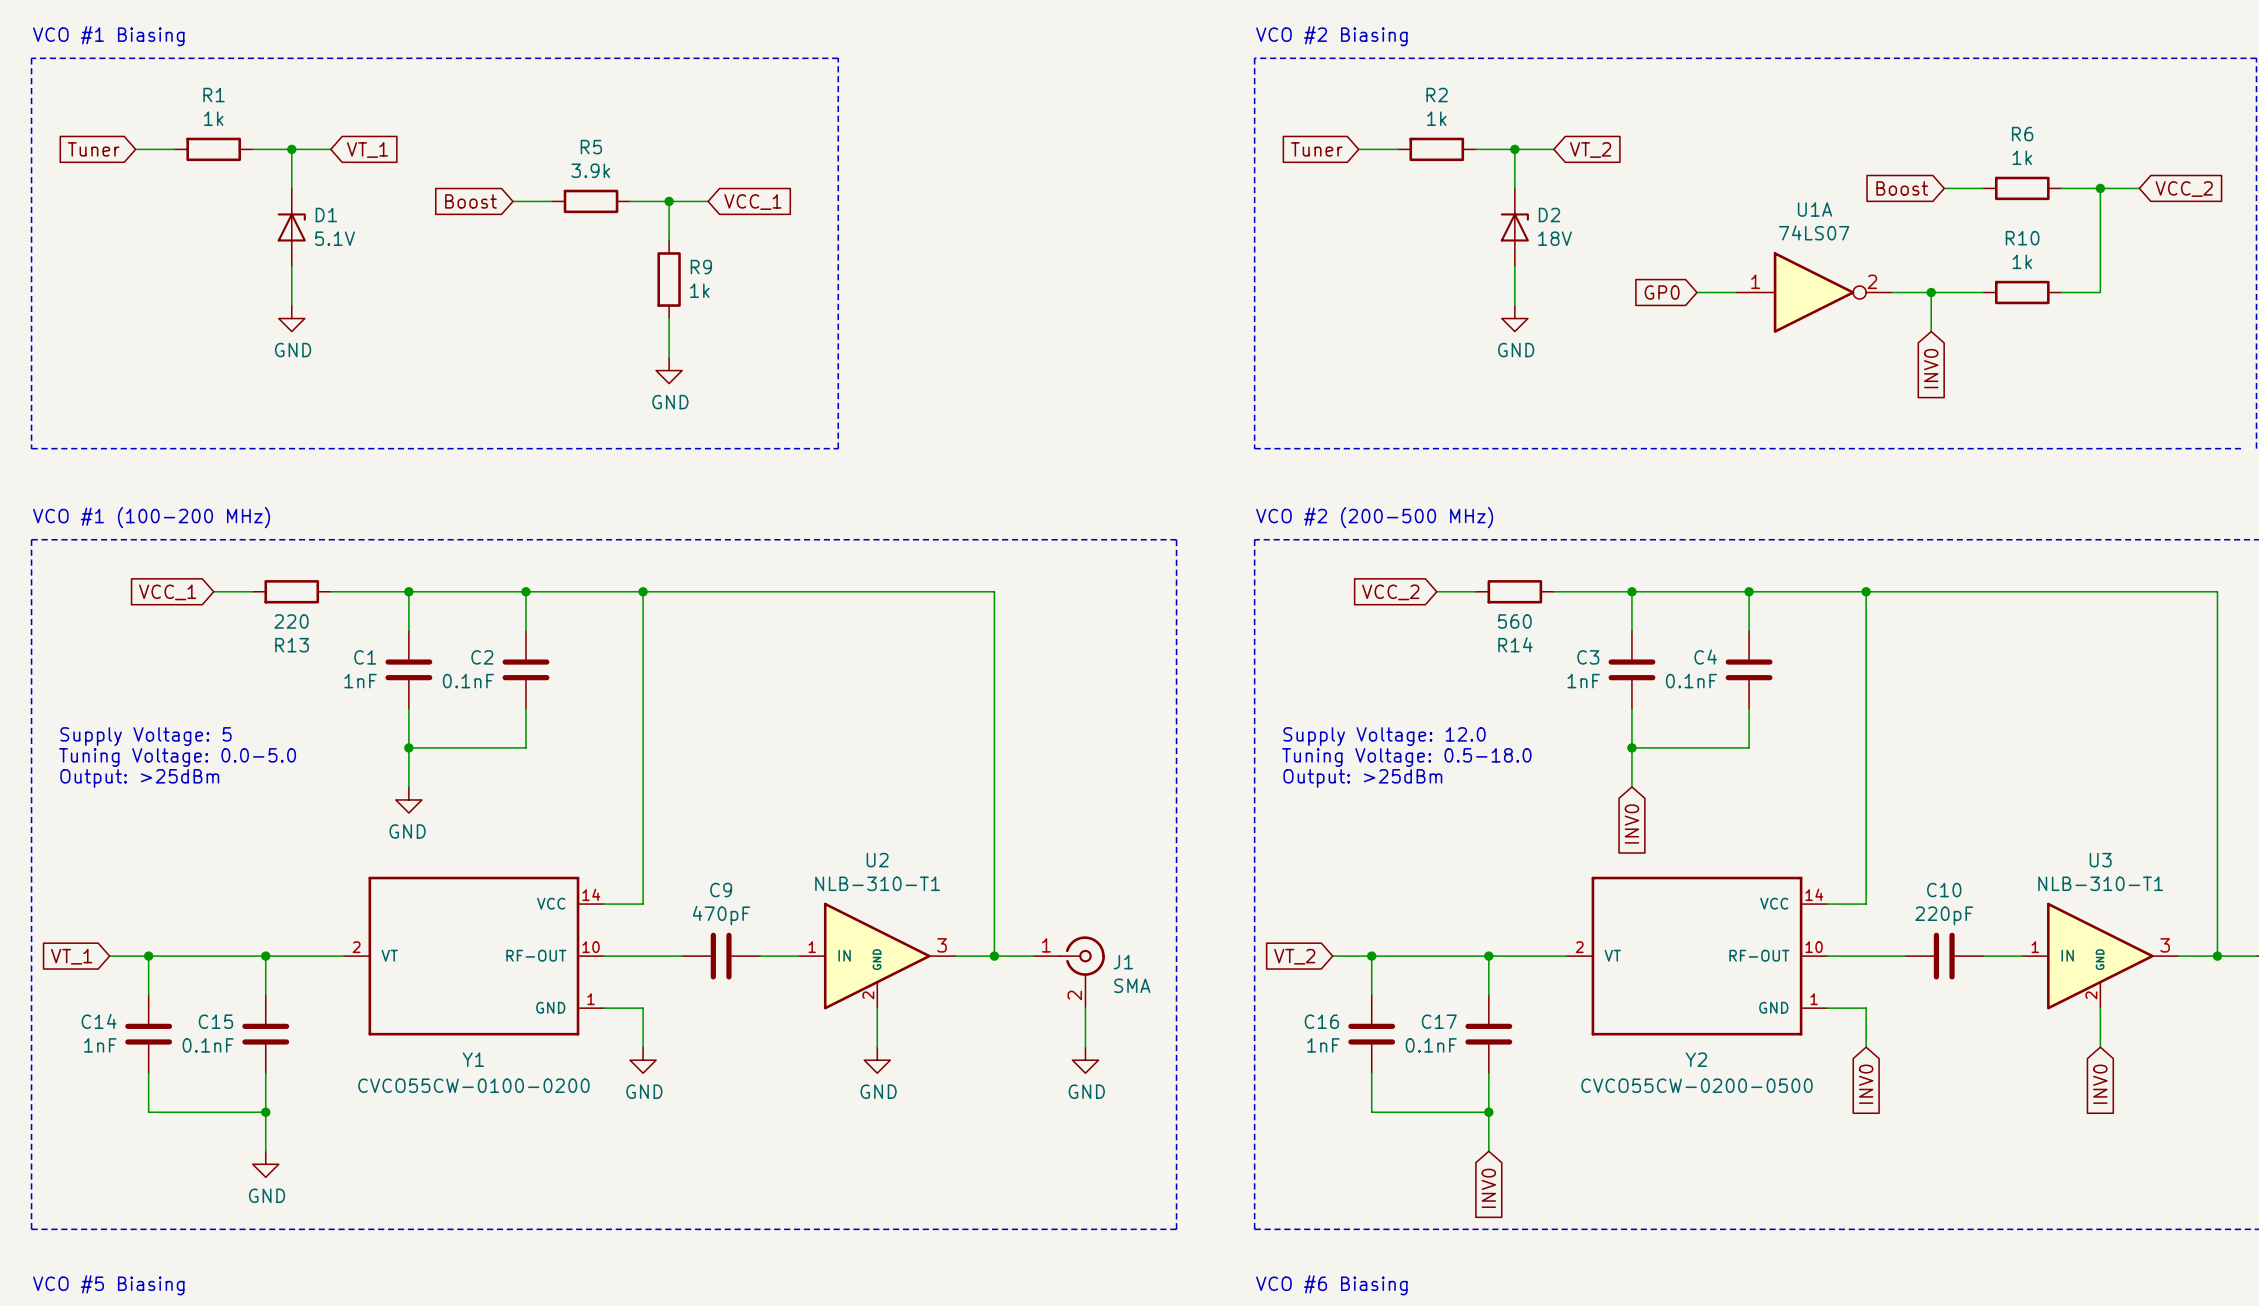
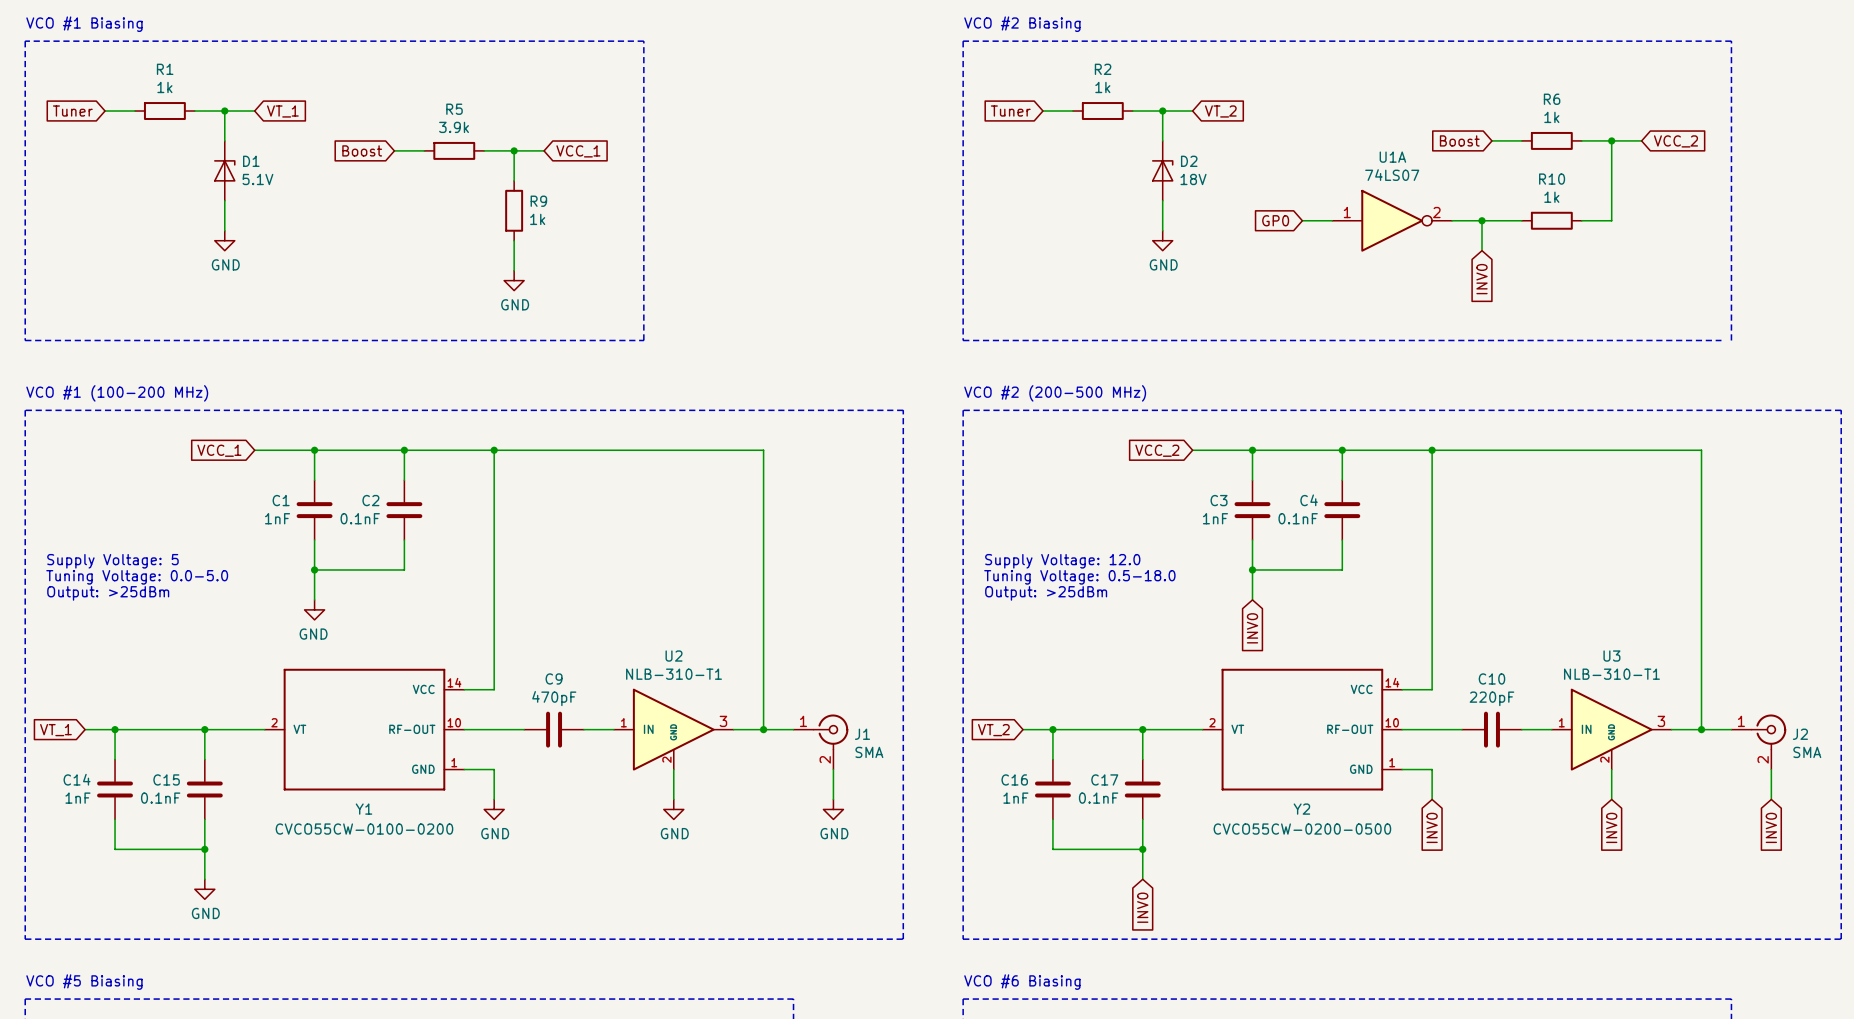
wire: (213, 591) (252, 591) -> none
R13: 220 (291, 591) -> none
wire: (1436, 591) (1475, 591) -> none
R14: 560 (1514, 591) -> none
global label position: VCC_1 (167, 592) -> VCC_1 (219, 450)
global label position: VCC_2 (1390, 592) -> VCC_2 (1157, 450)

